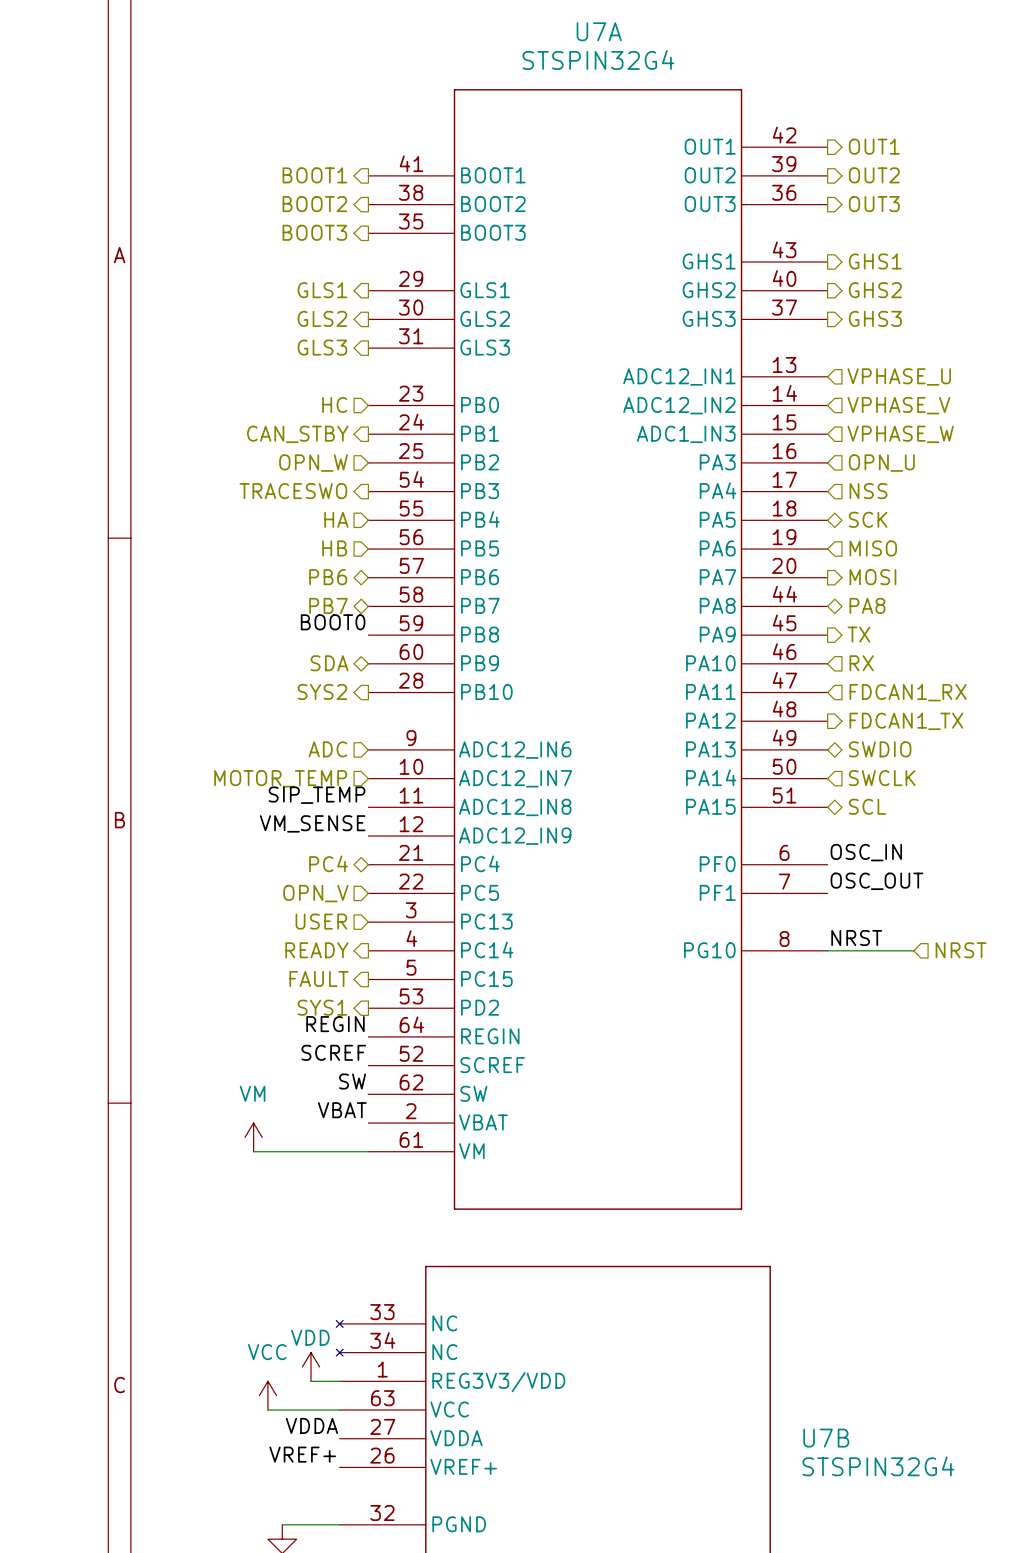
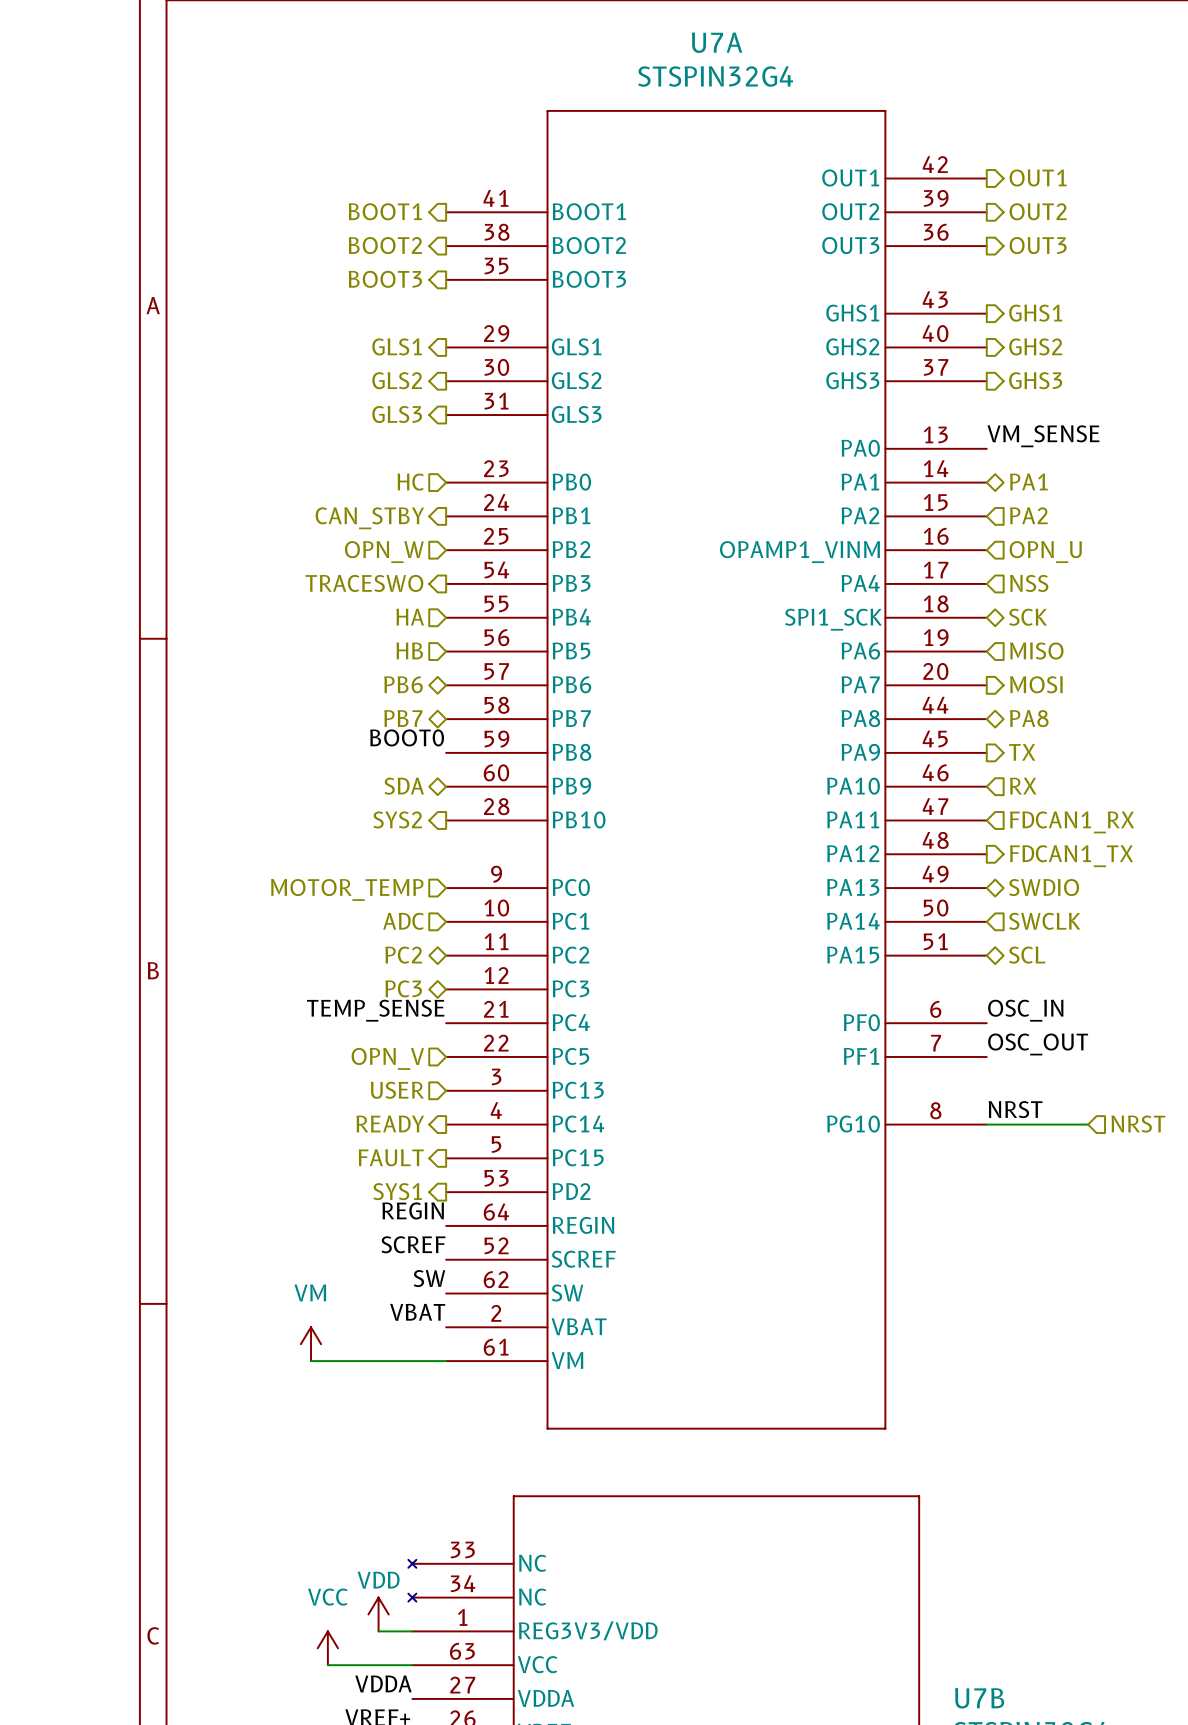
U7A symbol: [368, 89, 828, 1210] -> [446, 110, 987, 1430]
label: none -> VM_SENSE (1043, 436)
hierarchical label: VPHASE_U (899, 376) -> none
hierarchical label shape: input (898, 405) -> bidirectional (1028, 481)
hierarchical label: VPHASE_V (898, 405) -> PA1 (1028, 481)
hierarchical label: VPHASE_W (900, 434) -> PA2 (1028, 515)
hierarchical label: ADC (327, 749) -> MOTOR_TEMP (347, 889)
hierarchical label: MOTOR_TEMP (280, 778) -> ADC (403, 921)
label: SIP_TEMP (317, 795) -> none
hierarchical label: none -> PC2 (403, 955)
label: VM_SENSE (312, 823) -> TEMP_SENSE (375, 1010)
hierarchical label: PC4 (328, 863) -> PC3 (403, 988)

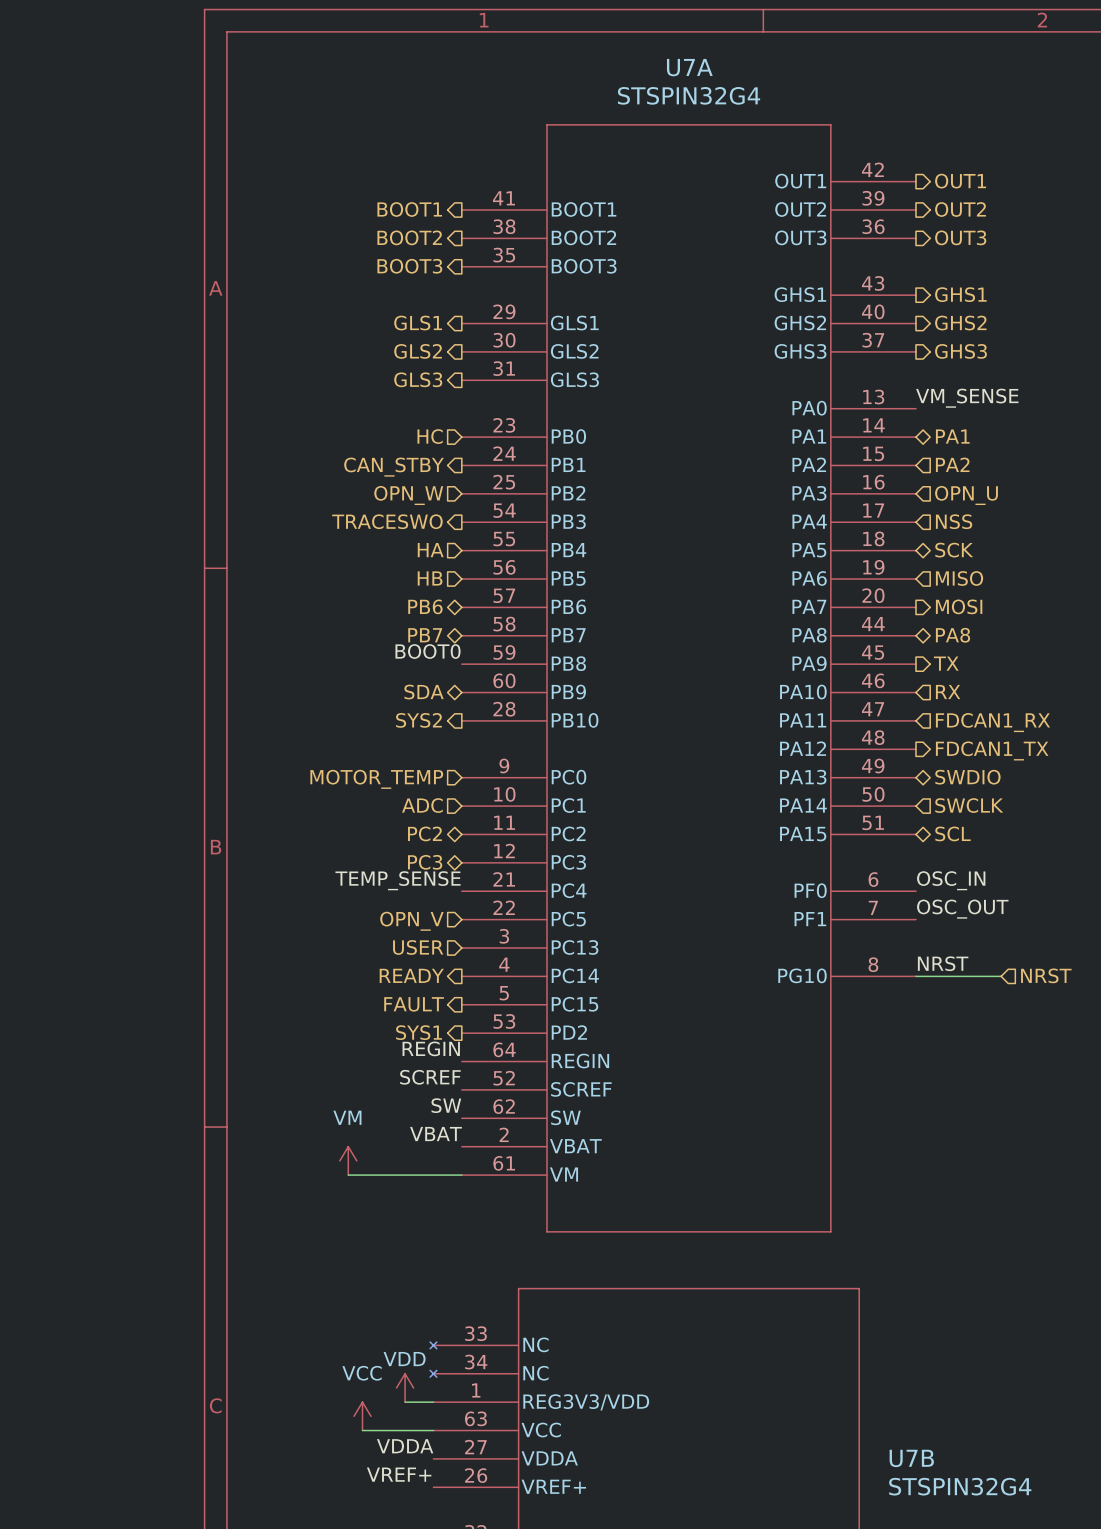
U7A pin name: OPAMP1_VINM (799, 552) -> PA3 (809, 493)
U7A pin name: SPI1_SCK (833, 619) -> PA5 (809, 550)

